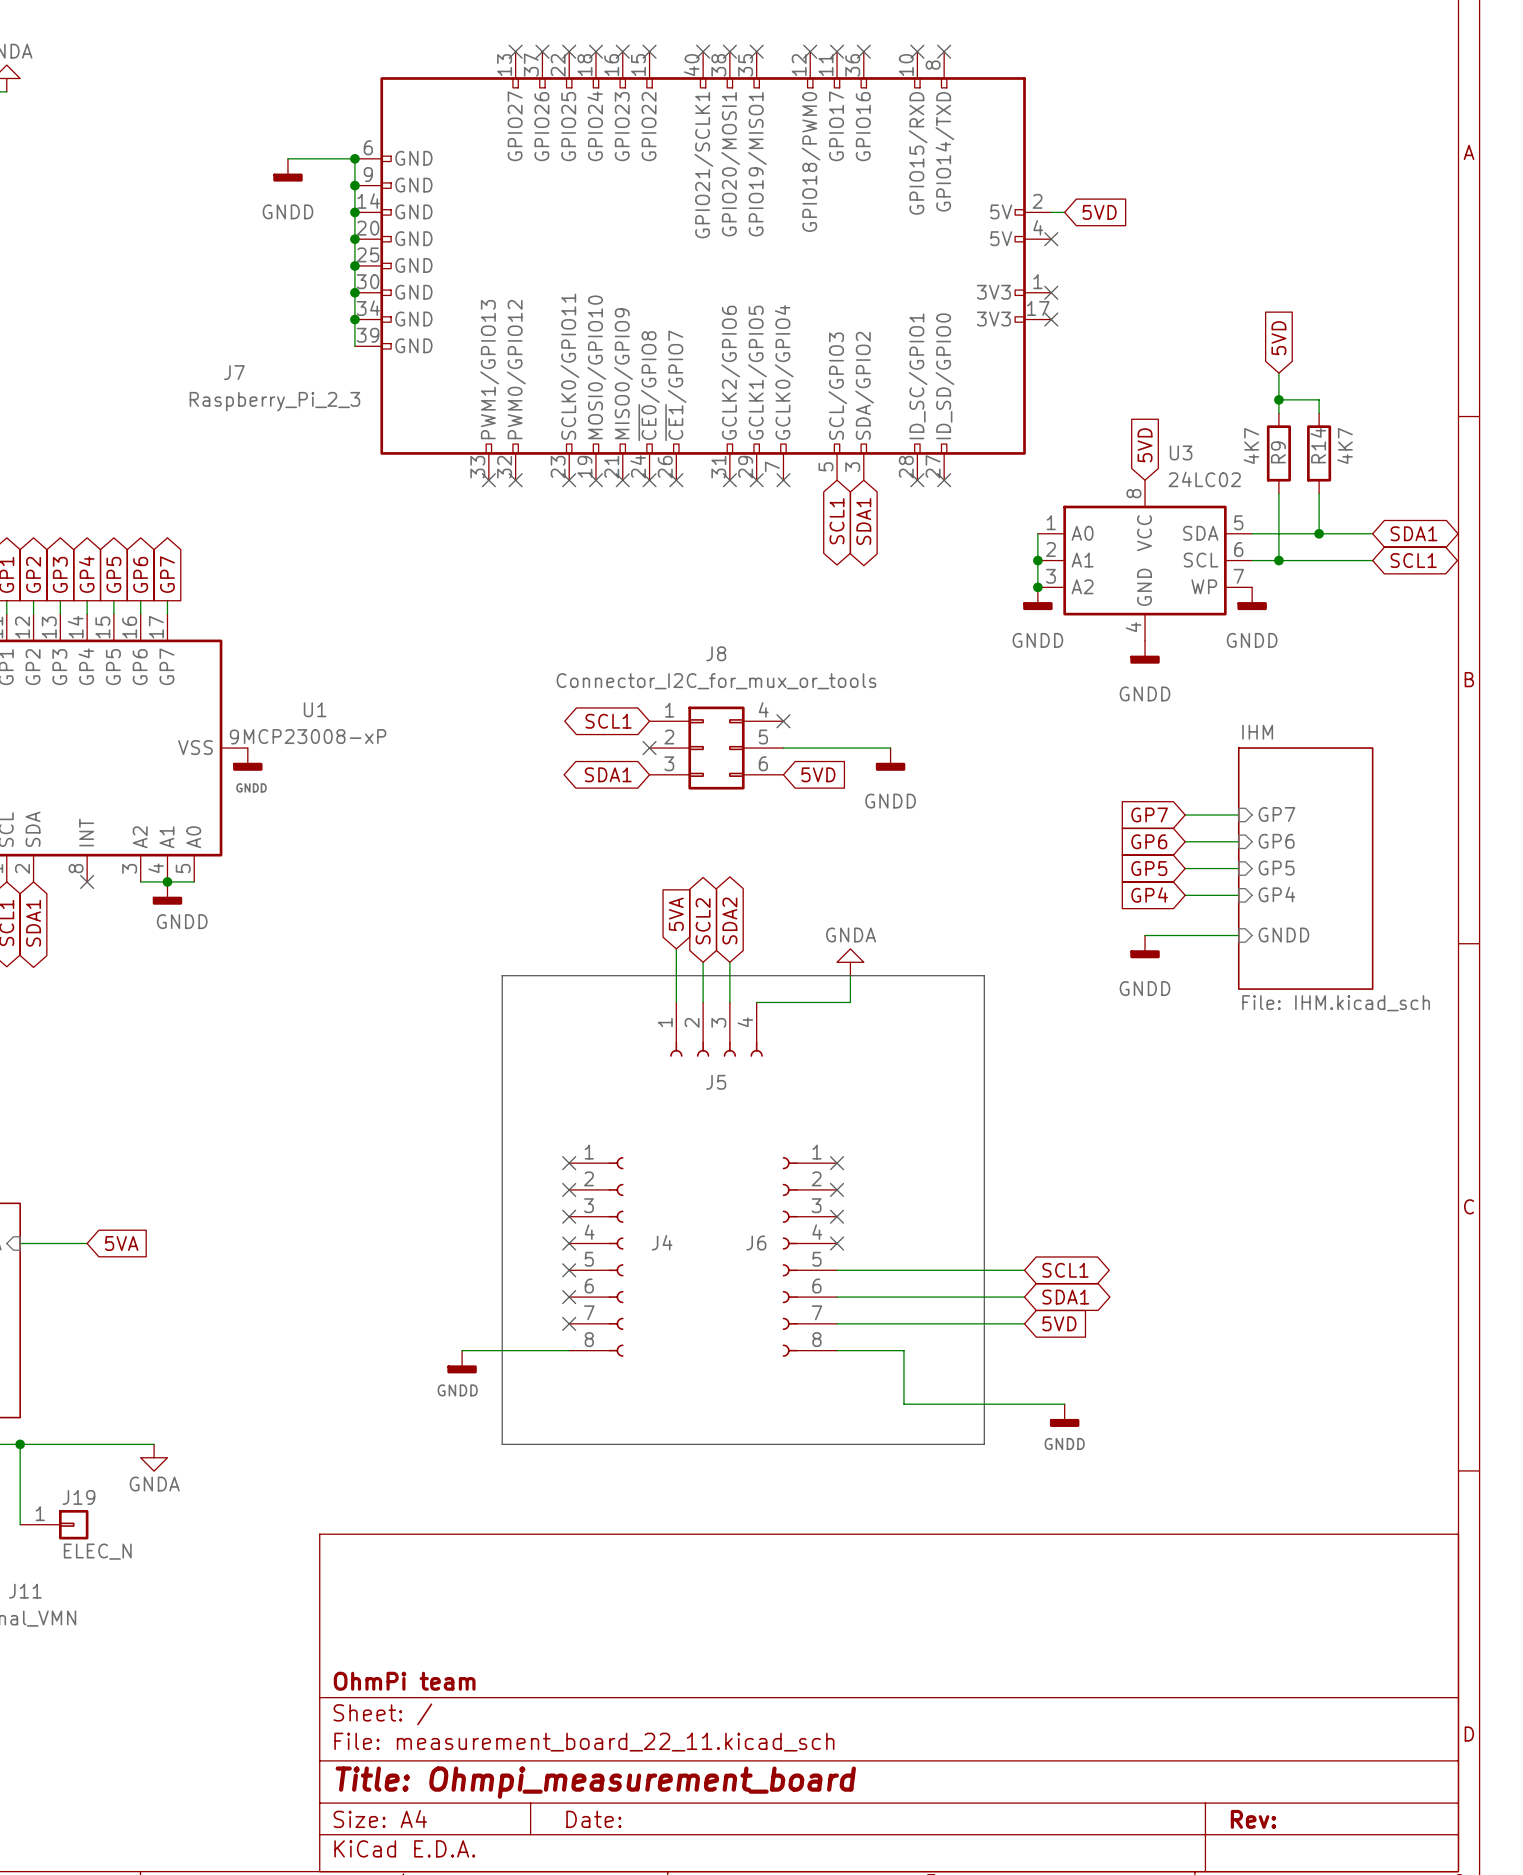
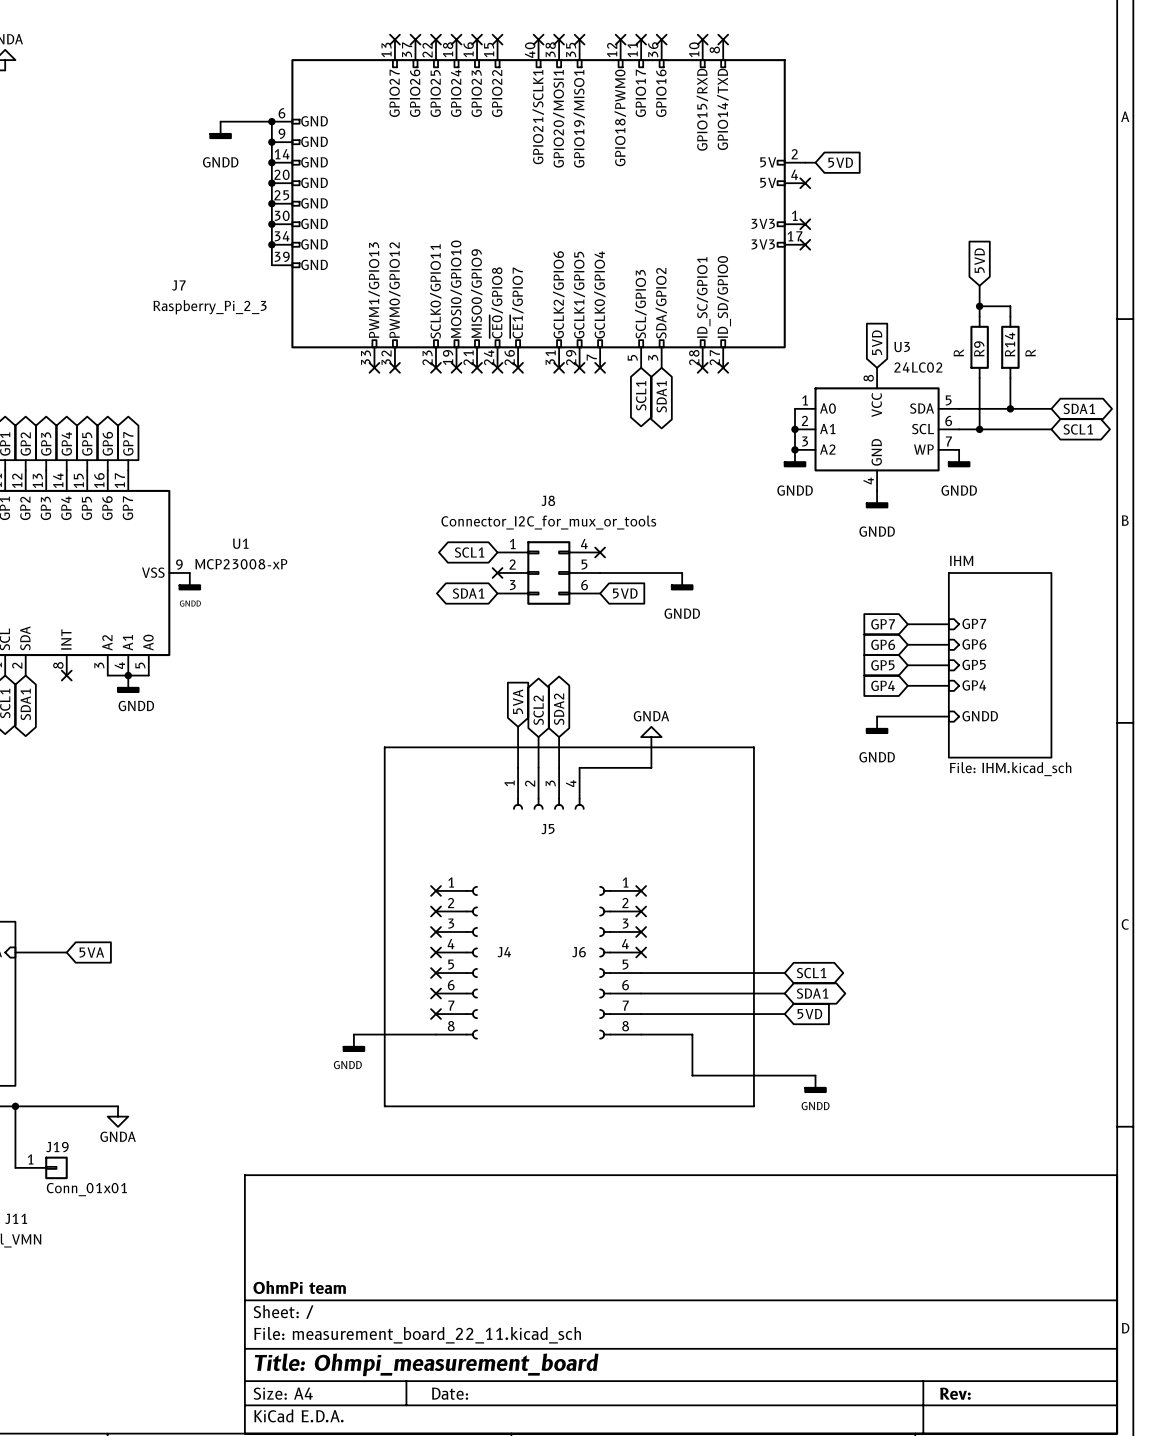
R9 value: 4K7 (1251, 446) -> R (958, 352)
R14 value: 4K7 (1345, 446) -> R (1030, 352)
J19 value: ELEC_N (97, 1551) -> Conn_01x01 (86, 1189)

